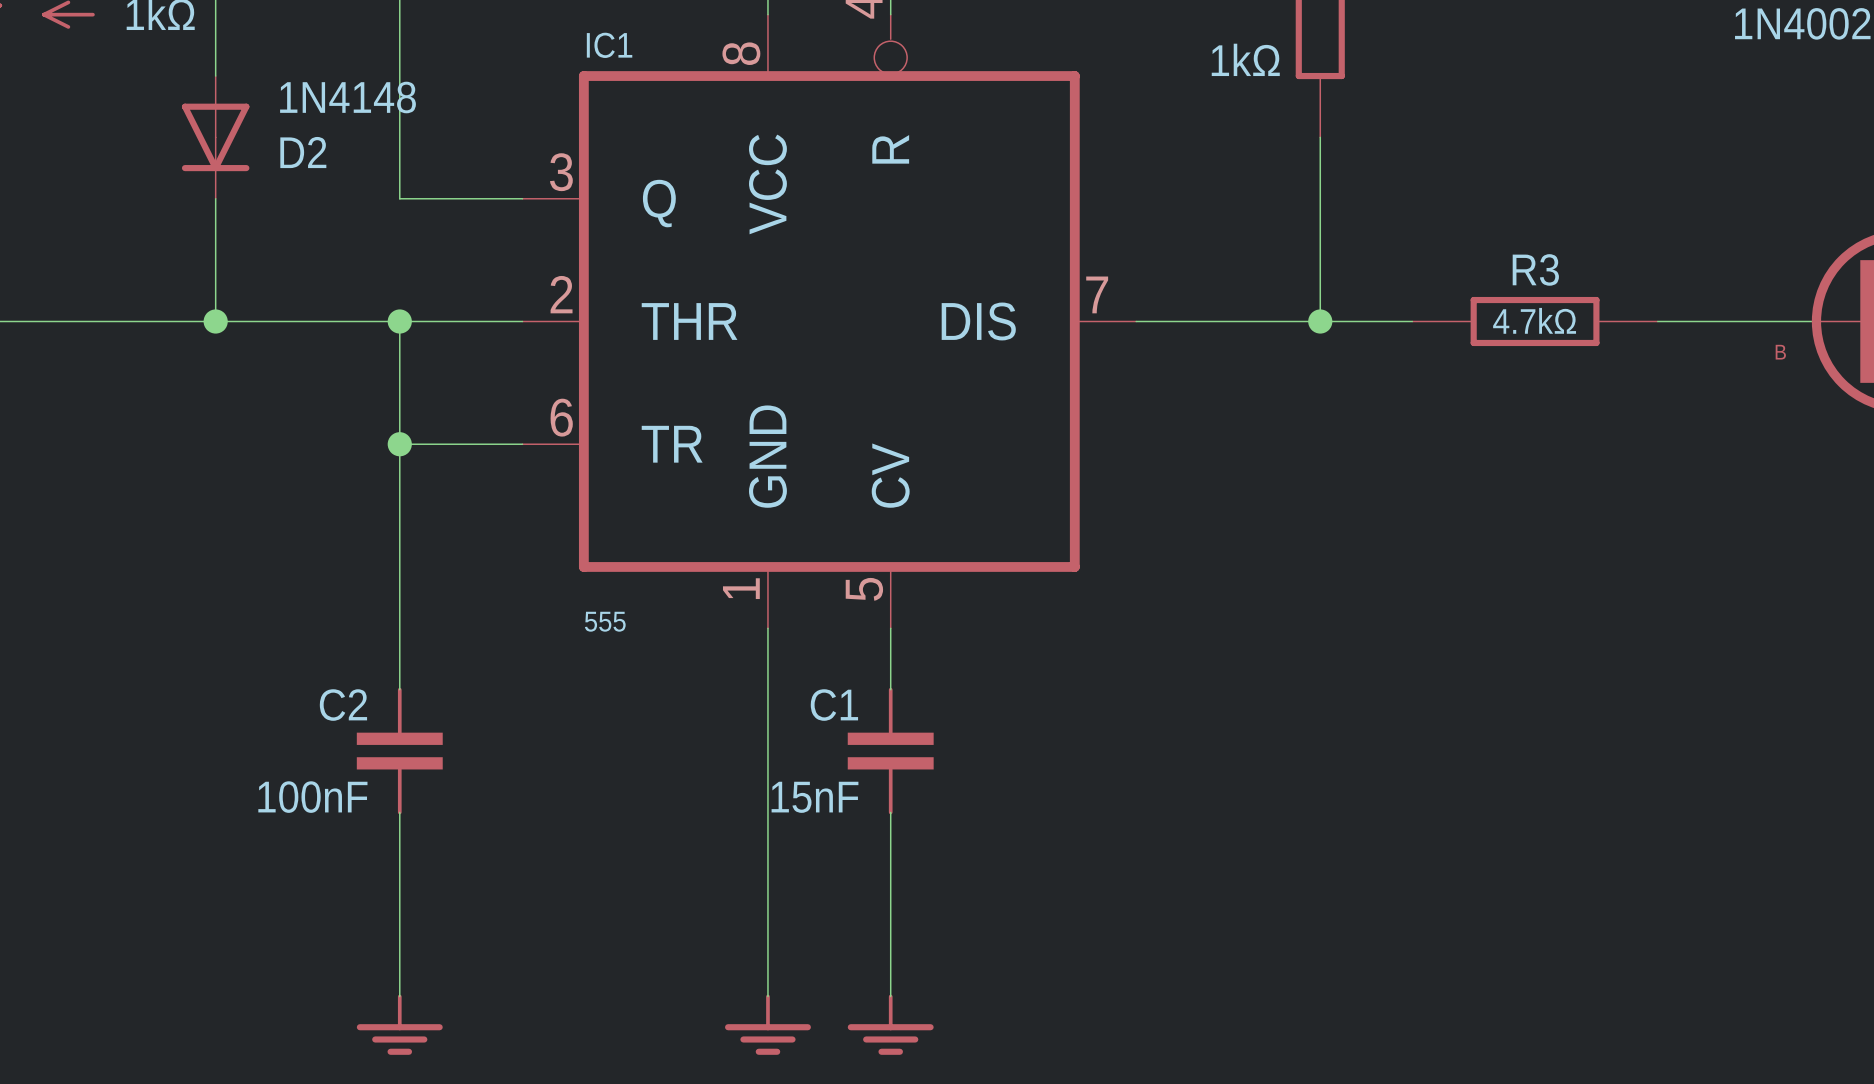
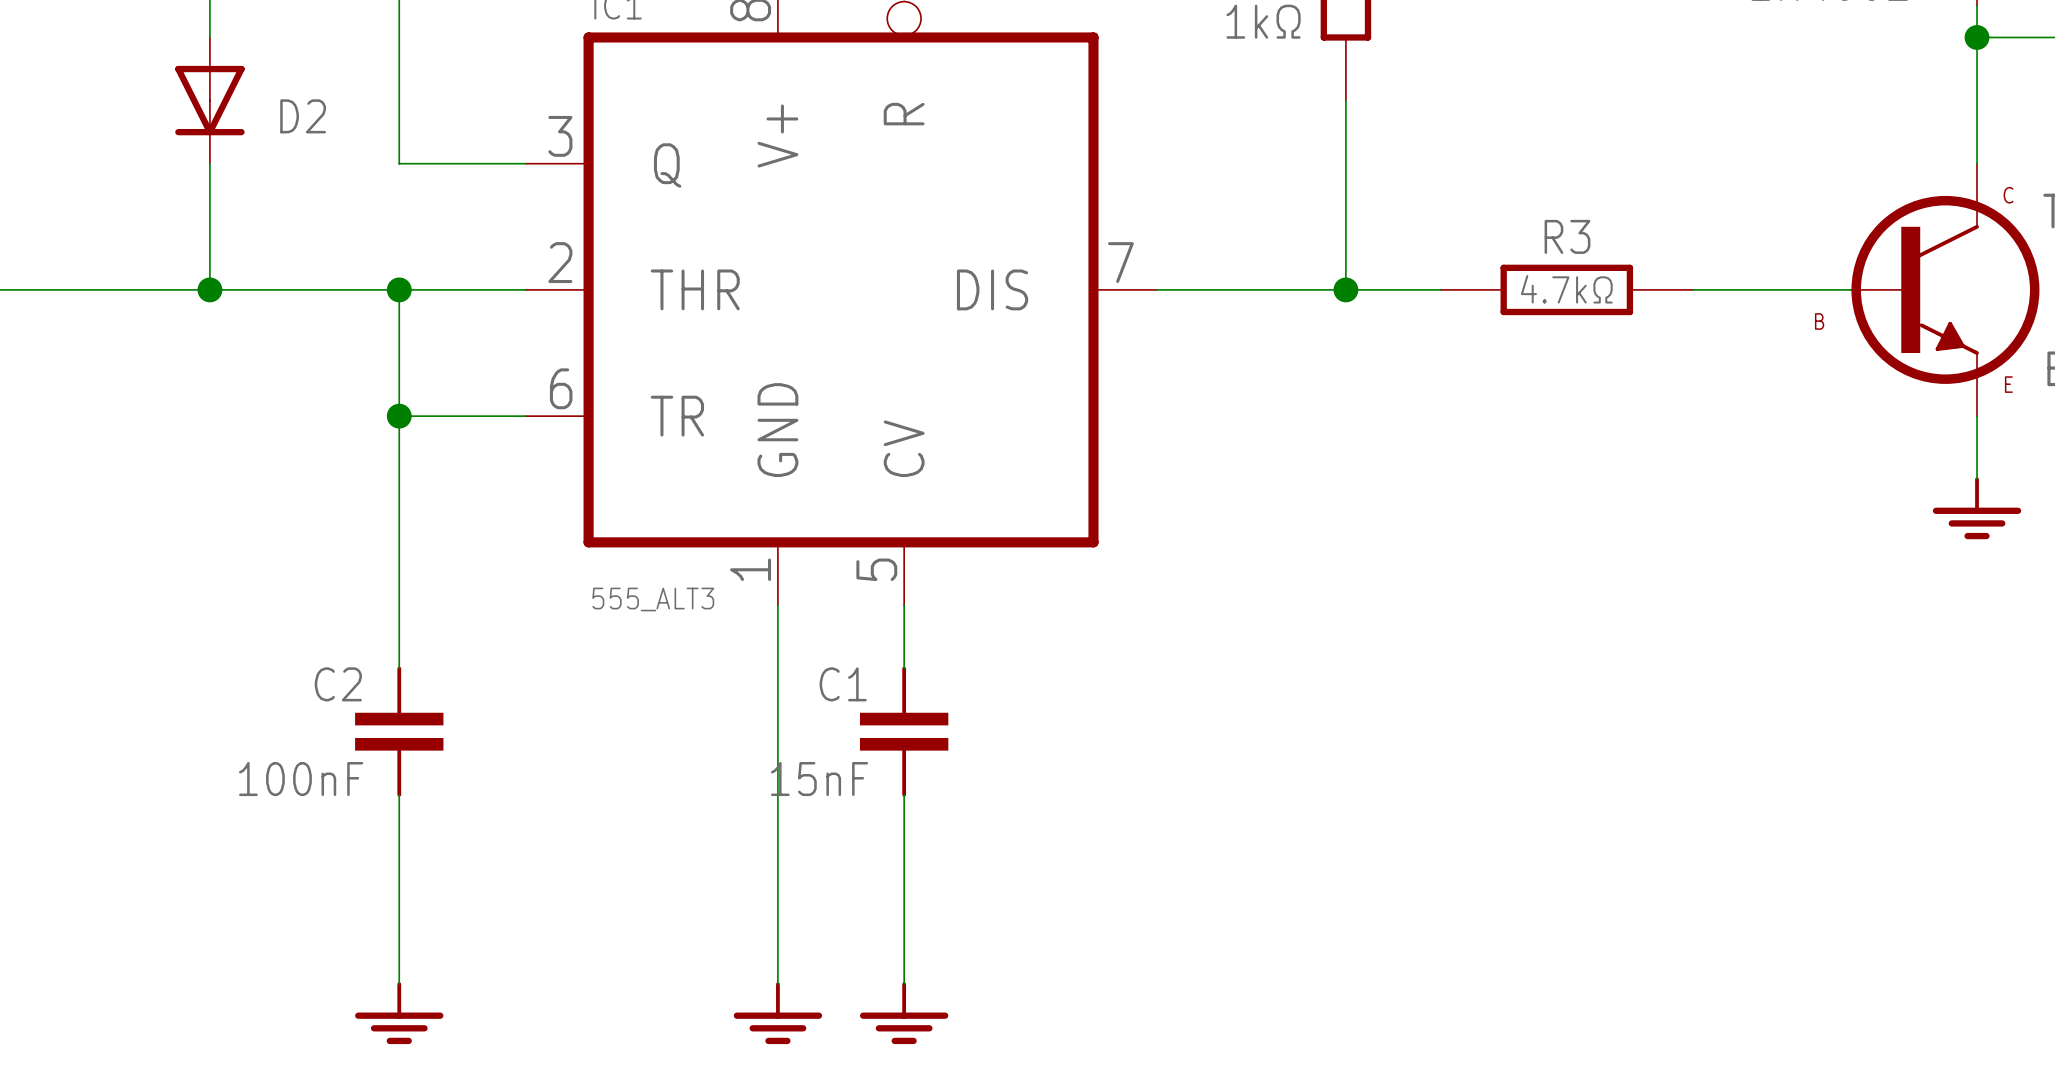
D2 value: 1N4148 (348, 97) -> none
IC1 pin name: VCC (767, 184) -> V+ (777, 136)
IC1 value: 555 (605, 621) -> 555_ALT3 (653, 599)

